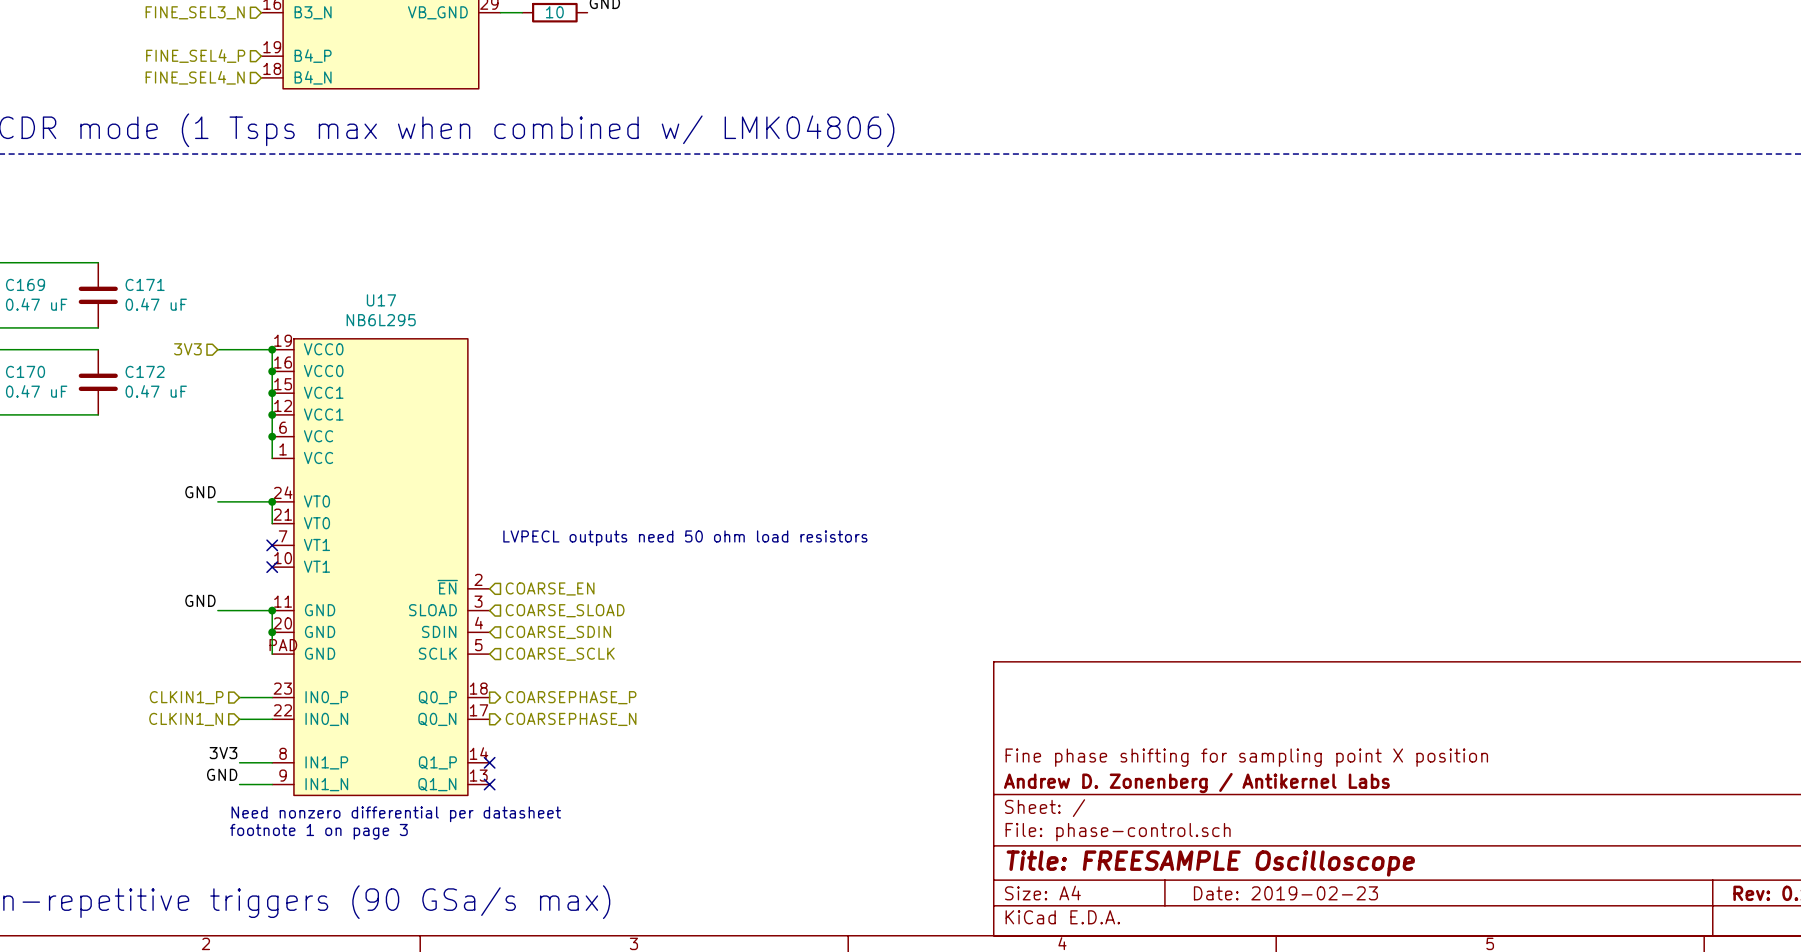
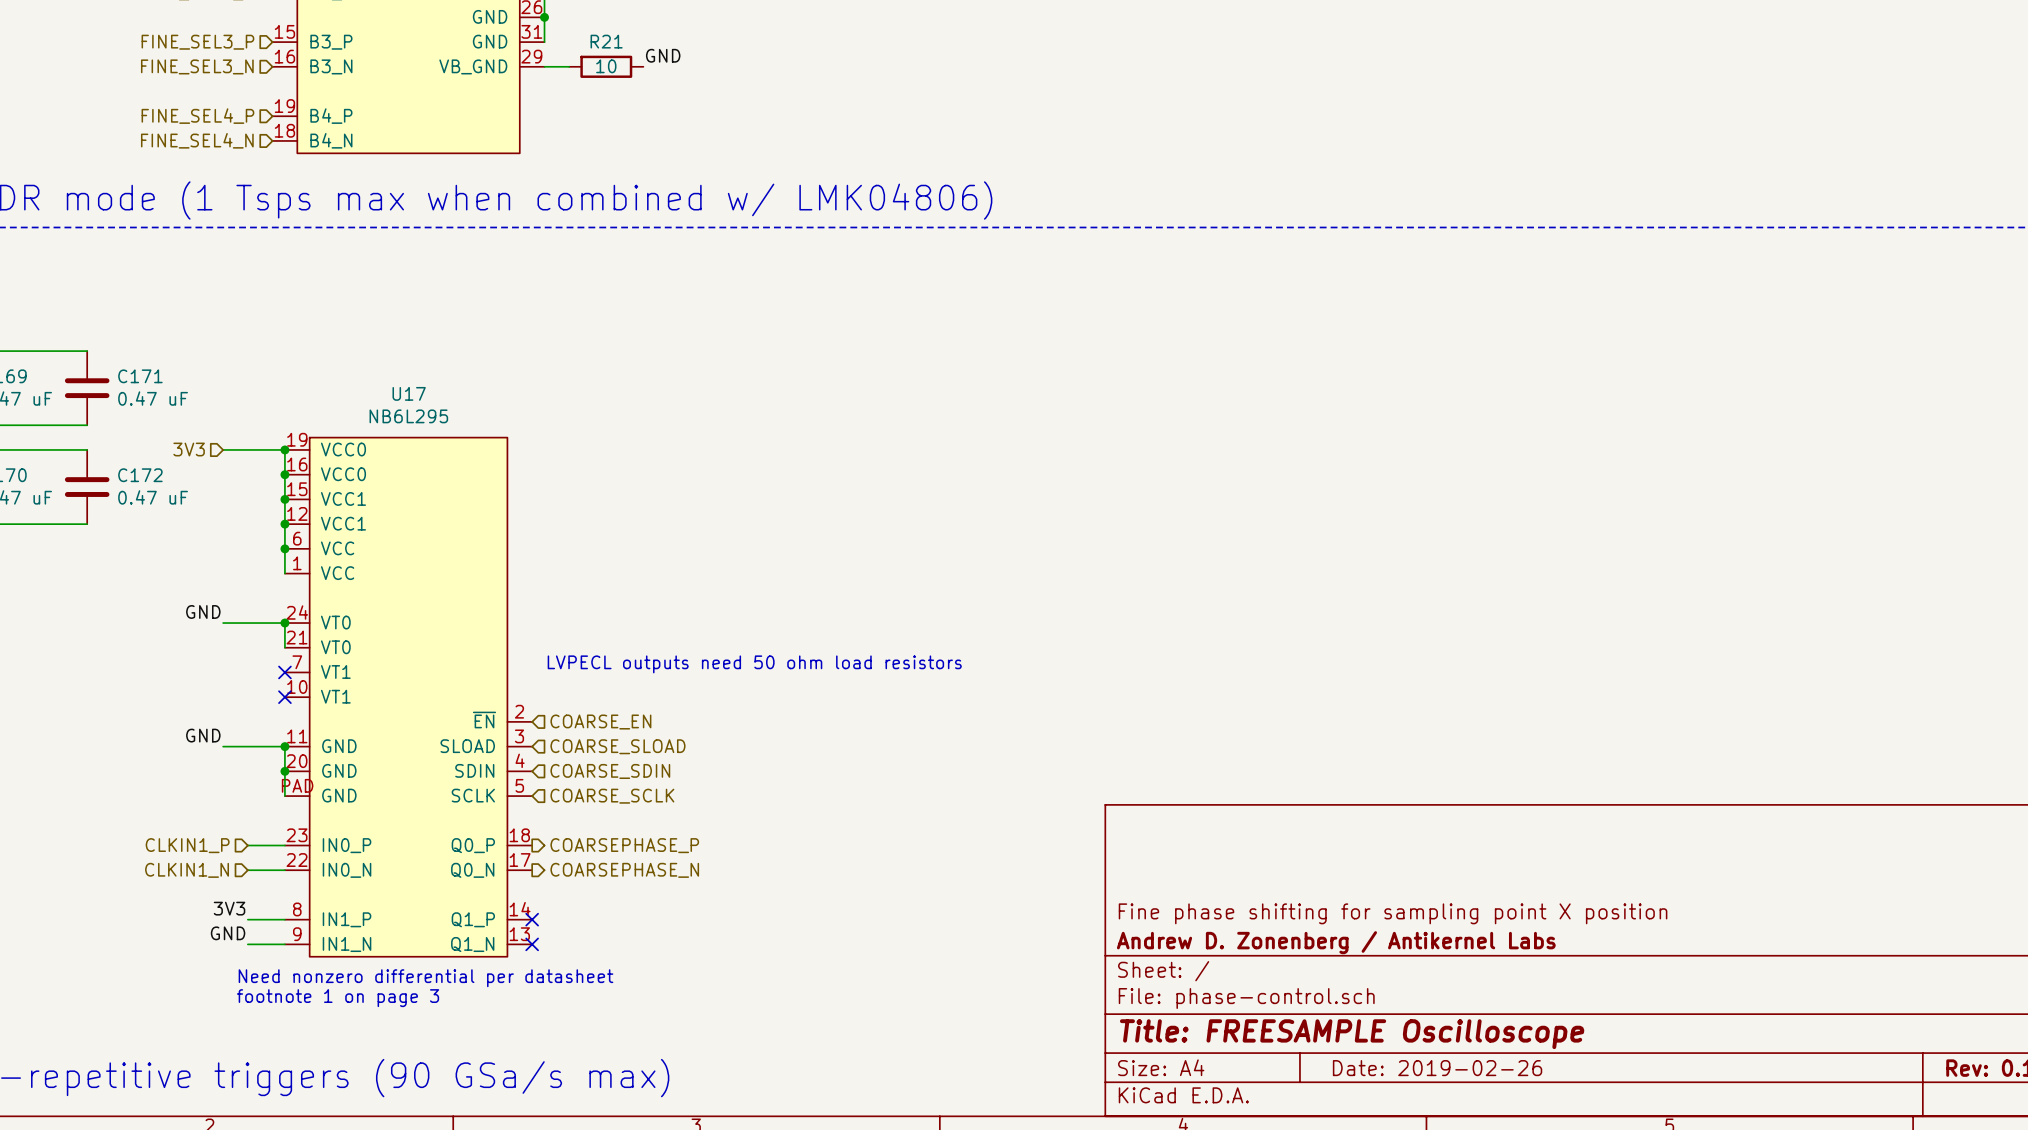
title block: Date: 2019-02-23 (1285, 893) -> Date: 2019-02-26 (1437, 1068)

